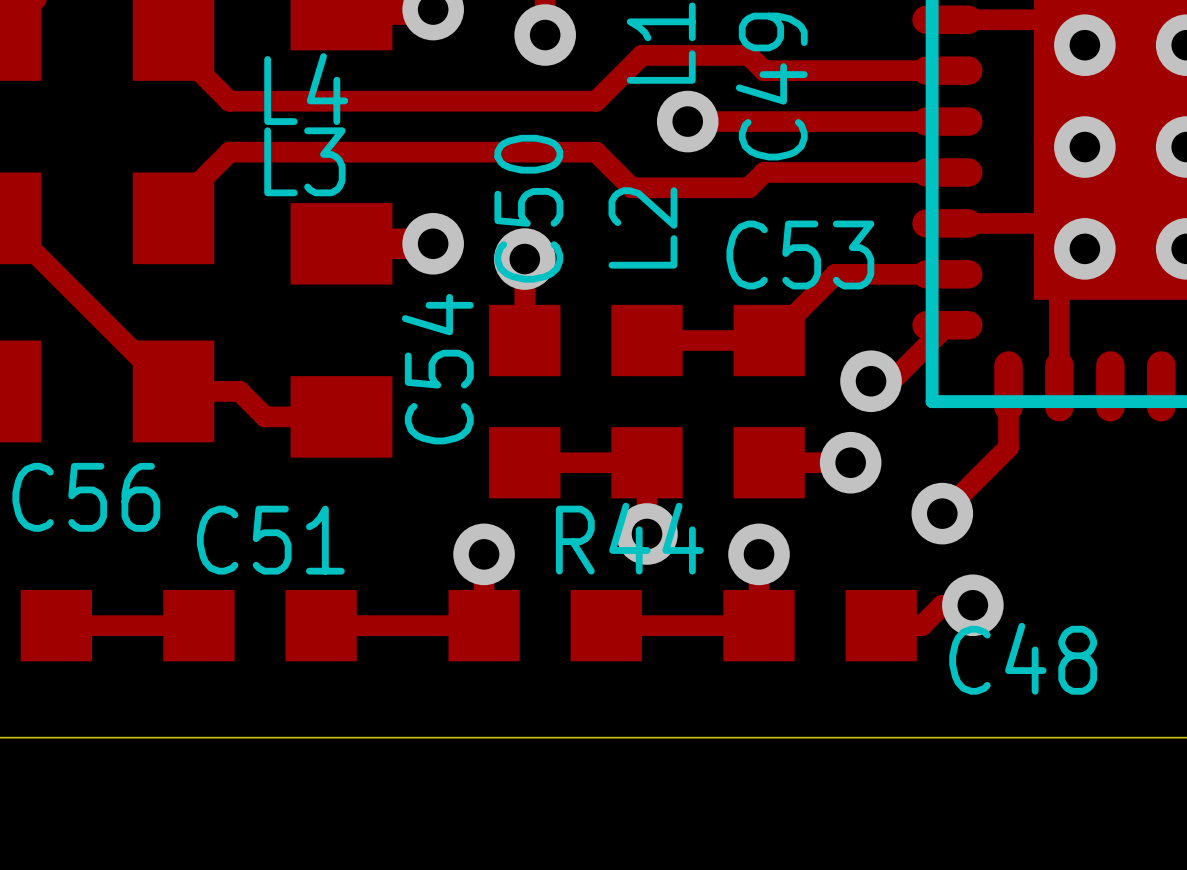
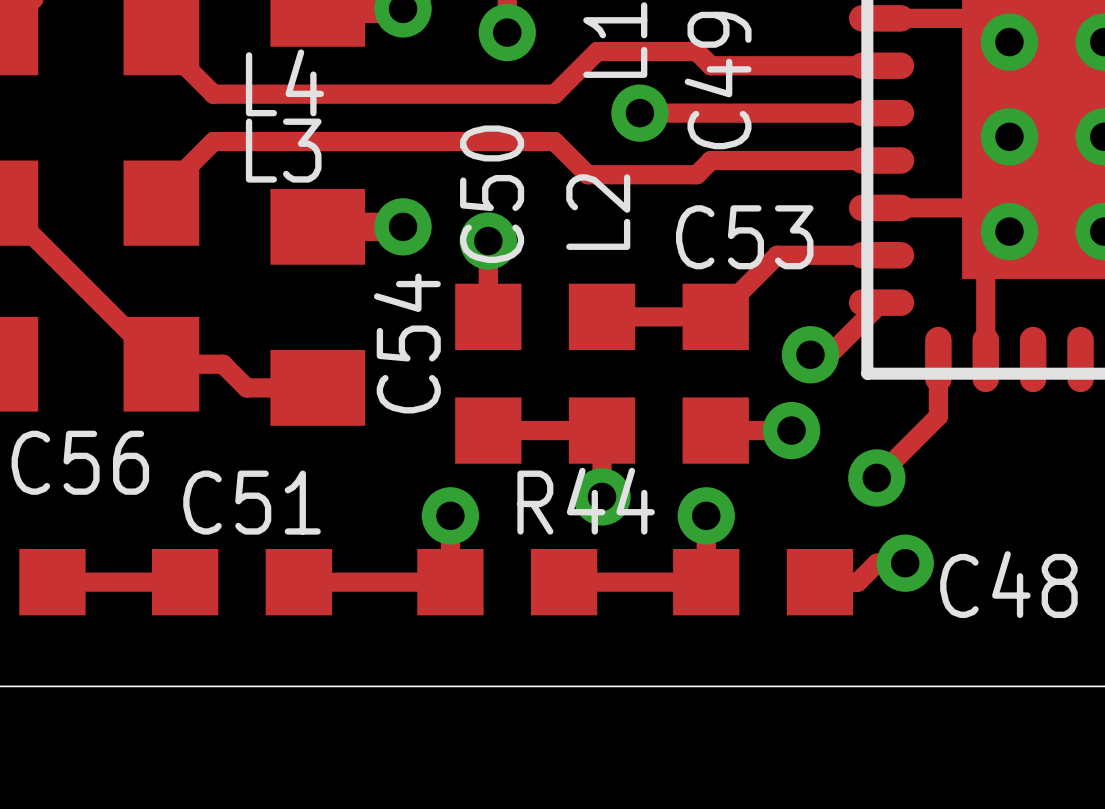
C48 name position: C48 (1023, 658) -> C48 (1008, 584)

